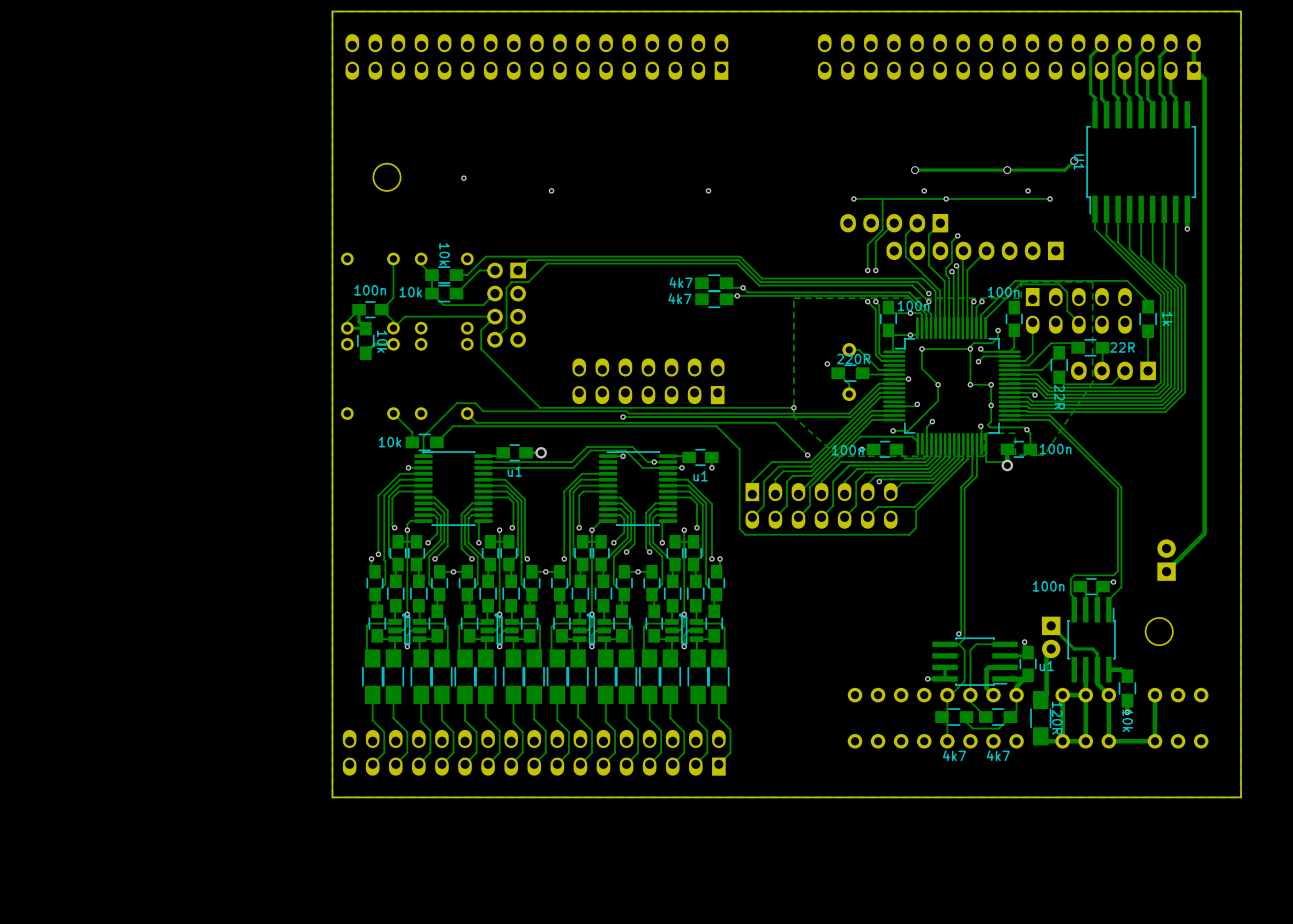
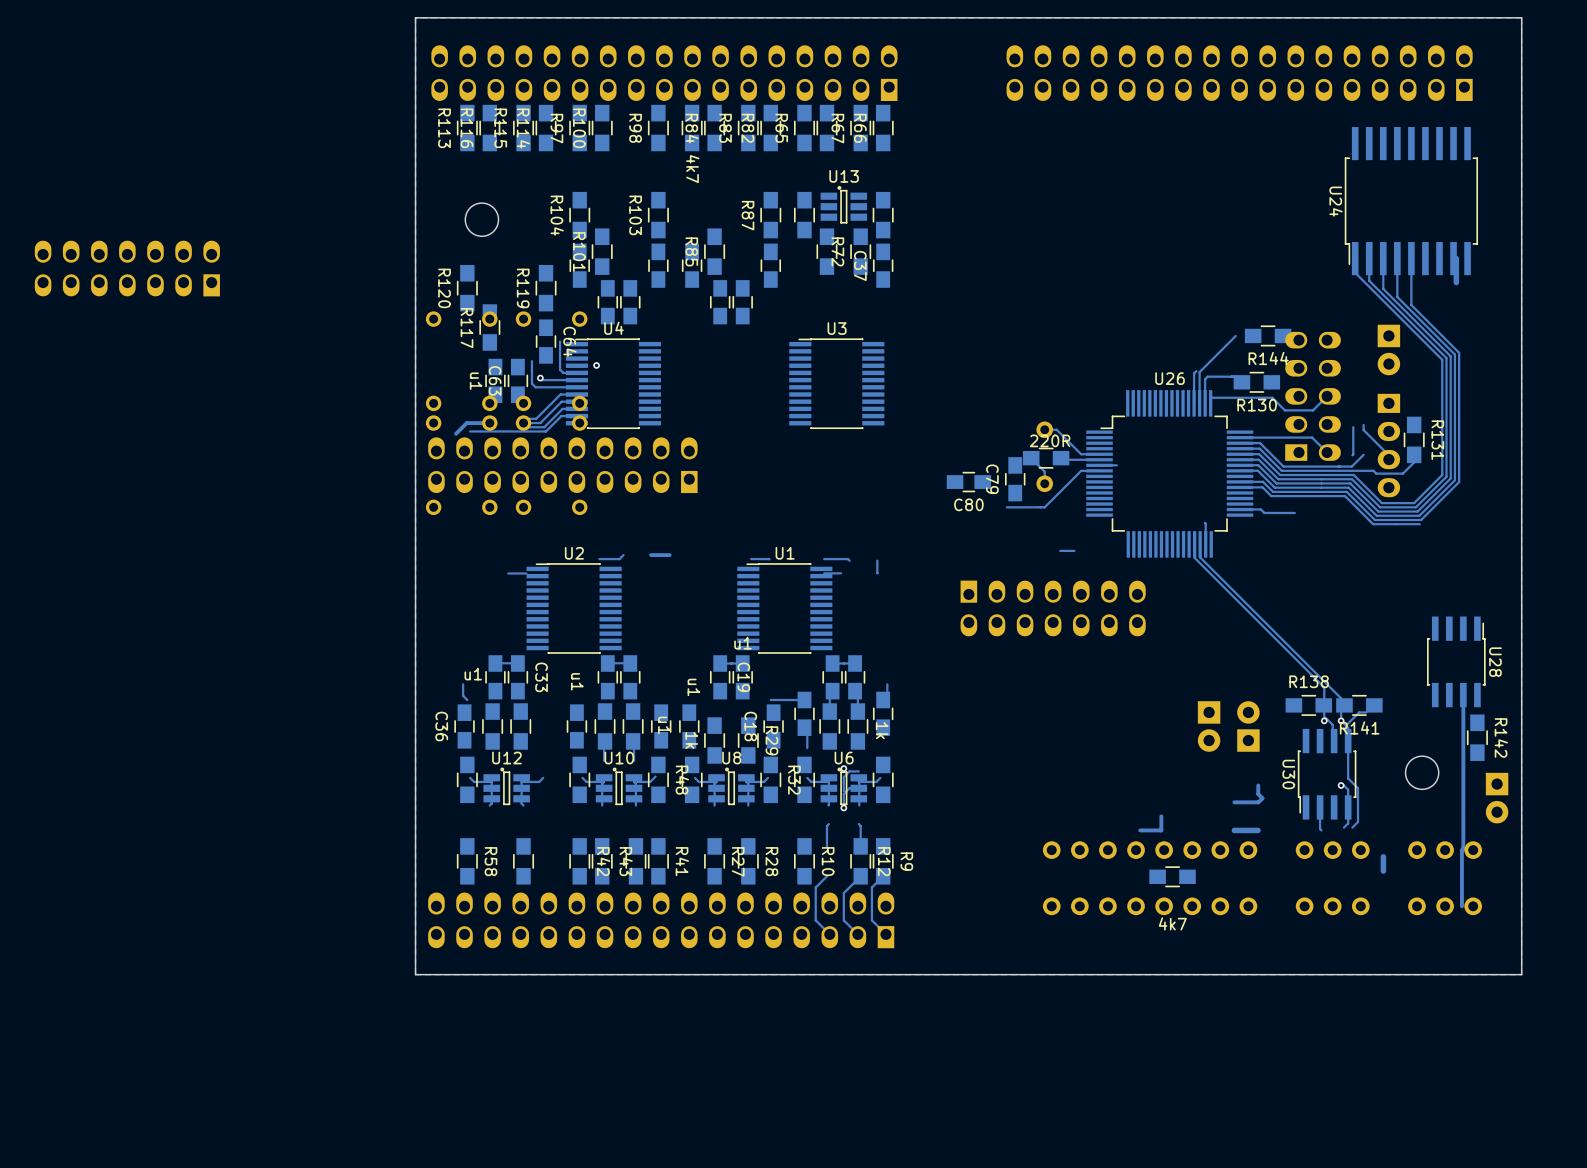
track: (1101, 45) (1090, 56) (1090, 93) (1095, 97) (1095, 114) -> none
track: (1124, 45) (1113, 56) (1113, 93) (1118, 97) (1118, 114) -> none
track: (1147, 45) (1136, 56) (1136, 93) (1141, 97) (1141, 114) -> none
track: (1170, 45) (1159, 56) (1159, 93) (1164, 97) (1164, 114) -> none
track: (1193, 45) (1193, 68) (1204, 79) (1204, 533) (1166, 571) -> none
track: (1101, 68) (1101, 98) (1106, 103) (1106, 114) -> none
track: (1124, 68) (1124, 93) (1129, 97) (1129, 114) -> none
track: (1147, 68) (1147, 98) (1152, 103) (1152, 114) -> none
track: (1170, 68) (1170, 93) (1175, 97) (1175, 114) -> none
U1 footprint: [1086, 101, 1196, 223] -> [737, 563, 833, 654]
R113: none -> (467, 128)
R116: none -> (489, 128)
R115: none -> (523, 128)
R114: none -> (546, 128)
R97: none -> (579, 128)
R100: none -> (602, 128)
R98: none -> (658, 128)
part: none -> 4k7 (692, 128)
R84: none -> (714, 128)
R83: none -> (748, 128)
R82: none -> (770, 128)
R65: none -> (804, 128)
part: none -> (826, 128)
R67: none -> (860, 128)
R66: none -> (883, 128)
track: (1074, 160) (1065, 170) (915, 170) -> none
via: (1074, 160) -> none
U1 name position: U1 (1079, 162) -> U1 (785, 553)
U24: none -> (1411, 201)
U13: none -> (843, 204)
via: (915, 170) -> none
via: (1007, 170) -> none
R104: none -> (579, 215)
R103: none -> (658, 215)
R87: none -> (770, 215)
part: none -> (804, 215)
part: none -> (883, 215)
via: (463, 178) -> none
via: (551, 190) -> none
via: (708, 190) -> none
via: (924, 190) -> none
via: (1028, 190) -> none
via: (853, 198) -> none
track: (882, 198) (882, 229) (867, 244) (867, 270) -> none
via: (946, 198) -> none
track: (1050, 198) (853, 198) -> none
via: (1050, 198) -> none
R101: none -> (602, 251)
R85: none -> (714, 251)
part: none -> (826, 251)
R72: none -> (860, 251)
track: (1095, 209) (1095, 229) (1160, 295) (1160, 382) (1155, 387) (1050, 387) (1037, 374) (1009, 374) -> none
track: (1106, 209) (1106, 235) (1164, 293) (1164, 383) (1156, 391) (1048, 391) (1036, 379) (1009, 379) -> none
track: (1118, 209) (1118, 242) (1167, 292) (1167, 385) (1158, 394) (1047, 394) (1036, 383) (1009, 383) -> none
track: (1129, 209) (1129, 249) (1171, 290) (1171, 386) (1159, 398) (1046, 398) (1036, 388) (1009, 388) -> none
track: (1141, 209) (1141, 255) (1174, 289) (1174, 388) -> (1355, 258) (1355, 272) (1442, 359) (1440, 476)
track: (1152, 209) (1152, 262) (1178, 287) (1178, 389) -> (1369, 258) (1369, 280) (1446, 358) (1445, 478)
track: (1164, 209) (1164, 269) (1181, 286) (1181, 391) -> (1383, 258) (1383, 288) (1450, 356) (1449, 479)
track: (1175, 209) (1175, 275) (1185, 284) (1185, 392) -> (1397, 258) (1397, 296) (1454, 354) (1453, 481)
part: none -> (579, 265)
part: none -> (658, 265)
part: none -> (692, 265)
part: none -> (770, 265)
C37: none -> (883, 265)
part: none -> (127, 268)
track: (894, 223) (875, 241) (875, 270) -> none
part: (894, 223) -> none
track: (917, 223) (905, 234) (905, 256) (940, 290) (940, 328) -> none
track: (940, 223) (928, 234) (928, 265) (944, 281) (944, 328) -> none
via: (1187, 228) -> none
R120: none -> (467, 288)
R119: none -> (546, 288)
track: (957, 235) (951, 241) (951, 262) (946, 268) (946, 275) (949, 278) (949, 328) -> none
via: (957, 235) -> none
part: none -> (607, 302)
part: none -> (630, 302)
part: none -> (720, 302)
part: none -> (742, 302)
track: (963, 250) (962, 328) -> none
part: (975, 250) -> none
track: (986, 250) (967, 270) (967, 328) -> none
track: (393, 258) (393, 298) (381, 309) (393, 321) (393, 328) (405, 316) (495, 316) (481, 330) (481, 348) (540, 407) (793, 407) -> none
track: (421, 258) (421, 264) (431, 275) (431, 293) (443, 305) (483, 305) (495, 293) -> none
R117: none -> (489, 327)
track: (956, 265) (958, 267) (958, 328) -> none
via: (956, 265) -> none
track: (495, 270) (479, 270) (456, 293) -> none
track: (518, 270) (528, 260) (738, 260) (760, 282) (917, 282) (928, 293) -> none
via: (867, 270) -> none
via: (875, 270) -> none
track: (951, 271) (953, 273) (953, 328) -> none
via: (951, 271) -> none
R144: none -> (1268, 335)
part: 10k (444, 275) -> none
track: (456, 275) (467, 275) (485, 256) (740, 256) (762, 278) (922, 278) (935, 291) (935, 328) -> none
C64: none -> (546, 341)
track: none -> (560, 341) (560, 369) (563, 372) (576, 372)
zone outline: (1092, 282) (1021, 282) (1021, 298) (793, 298) (793, 417) (837, 456) (984, 456) (984, 433) (1015, 433) (1015, 455) (1044, 455) (1092, 382) (1092, 282) -> none
part: 4k7 (714, 283) -> none
track: (726, 283) (731, 287) (743, 287) (747, 292) (909, 292) (931, 313) (931, 328) -> none
part: none -> (1388, 349)
via: (743, 287) -> none
track: none -> (531, 361) (531, 383) (535, 387) (576, 387)
part: 10k (444, 293) -> none
via: (928, 293) -> none
via: (737, 295) -> none
via: none -> (596, 365)
part: 4k7 (714, 299) -> none
track: (726, 299) (729, 295) (908, 295) (926, 314) (926, 328) -> none
track: (867, 301) (875, 309) (875, 355) (881, 360) (894, 360) -> none
via: (867, 301) -> none
track: (875, 301) (879, 305) (879, 353) (882, 356) (894, 356) -> none
via: (875, 301) -> none
track: (928, 301) (912, 285) (759, 285) (737, 263) (546, 263) (528, 282) (511, 282) (506, 287) (506, 328) (495, 339) -> none
via: (928, 301) -> none
via: (973, 301) -> none
track: (981, 301) (976, 307) -> (1235, 335) (1199, 372) (1199, 377)
via: (981, 301) -> none
part: (506, 305) -> none
track: (1148, 306) (1148, 301) (1127, 280) (1015, 280) (981, 315) -> (1241, 382) (1236, 376) (1207, 376) (1205, 379) (1205, 387)
track: none -> (540, 378) (542, 380) (576, 380)
via: none -> (540, 378)
track: (888, 307) (894, 313) (920, 313) (921, 328) -> none
U26 name: none -> U26 (1170, 378)
part: 100n (370, 309) -> none
part: none -> u1 (495, 380)
C63: none -> (517, 380)
R130: none -> (1256, 382)
part rotation: 0° (1078, 310) -> 90° counterclockwise (1313, 396)
U4: none -> (613, 383)
U3: none -> (836, 383)
via: (910, 313) -> none
part: 100n (888, 318) -> none
part: 100n (1014, 318) -> none
part: 1k (1148, 318) -> none
track: none -> (576, 394) (560, 394) (536, 418) (529, 418)
track: (1032, 322) (1032, 353) (1025, 360) (1009, 360) -> (1363, 454) (1351, 466) (1283, 466) (1260, 443) (1239, 443)
track: (1078, 322) (1067, 310) (1067, 292) (1059, 284) (1020, 284) (985, 318) (985, 328) -> none
track: none -> (1327, 396) (1313, 410) (1284, 410) (1272, 397) (1210, 397)
track: none -> (576, 401) (561, 401) (540, 423) (529, 423)
track: (365, 328) (347, 328) (347, 321) (359, 309) (359, 321) (365, 328) -> none
track: (917, 328) (915, 335) (893, 335) (888, 330) -> none
track: (998, 330) (998, 337) (992, 343) (973, 343) (970, 346) (970, 384) (991, 384) (991, 421) (987, 425) (990, 427) (1024, 427) (1030, 433) (1030, 449) -> none
via: (998, 330) -> none
track: (1014, 330) (1014, 347) (1009, 351) (983, 351) (980, 348) -> none
track: (1148, 331) (1148, 370) -> none
track: none -> (576, 408) (562, 408) (544, 427) (526, 427)
track: (893, 334) (894, 351) -> none
via: (910, 335) -> none
track: none -> (576, 416) (561, 416) (546, 431) (470, 431)
part: 10k (365, 340) -> none
track: none -> (1363, 424) (1363, 430) (1388, 455) (1388, 459)
track: (1078, 347) (1073, 343) (1051, 343) (1028, 365) (1009, 365) -> (1414, 454) (1414, 462) (1402, 473) (1376, 473) (1373, 470) (1281, 470) (1259, 448) (1239, 448)
part: 22R (1090, 347) -> none
via: (921, 348) -> none
track: (970, 348) (921, 348) (921, 368) (938, 384) (938, 400) (908, 430) (893, 430) -> none
via: (970, 348) -> none
via: (980, 348) -> none
track: (1059, 352) (1042, 369) (1009, 369) -> (1424, 492) (1414, 503) (1381, 503) (1353, 475) (1280, 475) (1259, 454) (1239, 454)
track: (1009, 356) (983, 356) (978, 361) -> (1239, 437) (1312, 437) (1327, 452)
R131: none -> (1414, 439)
via: (978, 361) -> none
via: (827, 363) -> none
part: 22R (1059, 365) -> none
part rotation: 0° (1113, 370) -> 90° counterclockwise (1388, 445)
track: (1125, 370) (1111, 384) (1063, 384) (1059, 377) -> none
part: none -> (562, 465)
via: (908, 379) -> none
part: (648, 381) -> none
via: (938, 384) -> none
via: (970, 384) -> none
via: (991, 384) -> none
track: (894, 388) (879, 388) (850, 417) (623, 417) -> none
C79: none -> (1015, 479)
C80: none -> (968, 482)
track: (894, 392) (879, 392) (810, 462) (771, 462) (752, 481) (752, 494) -> none
track: (1009, 392) (1032, 392) (1035, 395) -> (1239, 481) (1263, 481) (1273, 491) (1346, 491) (1374, 519) (1421, 519) (1459, 482) (1459, 352) (1411, 305) (1411, 258)
via: (1035, 395) -> none
track: (894, 397) (880, 397) (810, 466) -> none
track: (1009, 397) (1028, 397) (1032, 401) (1161, 401) -> (1239, 487) (1262, 487) (1271, 496) (1345, 496) (1373, 524) (1419, 524)
track: (1009, 401) (1027, 401) (1030, 405) (1162, 405) -> (1239, 459) (1258, 459) (1278, 479) (1352, 479) (1380, 507) (1415, 507) (1426, 496)
track: (917, 404) (915, 406) (894, 406) -> none
via: (917, 404) -> none
via: (991, 405) -> none
track: (1009, 406) (1027, 406) (1029, 408) (1164, 408) -> (1239, 465) (1258, 465) (1276, 483) (1350, 483) (1378, 511) (1417, 511) (1428, 501)
via: (793, 407) -> none
track: (894, 410) (871, 410) (811, 471) (783, 471) (775, 479) (775, 494) -> none
track: (1009, 410) (1165, 411) -> (1239, 470) (1257, 470) (1274, 487) (1348, 487) (1376, 515) (1419, 515) (1429, 505)
track: (393, 413) (412, 432) (412, 442) -> none
track: (467, 413) (476, 422) (775, 422) (807, 455) -> none
track: (818, 413) (483, 411) (475, 403) (456, 403) (423, 436) (423, 456) -> none
track: (894, 415) (871, 415) (811, 475) (792, 475) (786, 481) (786, 505) (775, 517) -> none
track: (1009, 415) (1049, 415) (1121, 486) (1121, 587) (1108, 599) (1108, 609) -> (1239, 509) (1260, 509) (1264, 512) (1294, 512)
via: (623, 417) -> none
track: (894, 419) (872, 419) (798, 494) -> none
track: (1009, 419) (1049, 419) (1117, 488) (1117, 571) (1113, 575) (1074, 575) (1070, 578) (1070, 594) (1074, 597) (1074, 609) -> none
track: (932, 421) (926, 427) (926, 455) (924, 458) (905, 458) (896, 449) -> none
via: (932, 421) -> none
via: (980, 426) -> none
via: (1026, 429) -> none
via: (893, 430) -> none
part: 10k (424, 442) -> none
track: (436, 442) (453, 426) (716, 426) (739, 449) (739, 528) (745, 534) (909, 534) (916, 527) (916, 510) (967, 459) (967, 444) -> none
track: (917, 444) (912, 436) (860, 436) (810, 487) (810, 505) (798, 517) -> none
track: (931, 444) (931, 456) (925, 462) (841, 462) (821, 481) (821, 494) -> none
track: (936, 444) (936, 456) (927, 465) (849, 465) (833, 481) (833, 505) (821, 517) -> none
track: (940, 444) (940, 456) (928, 468) (857, 468) (844, 481) (844, 494) -> none
track: (945, 444) (945, 457) (929, 472) (865, 472) (856, 481) (856, 505) (844, 517) -> none
track: (949, 444) (949, 457) (931, 475) (875, 475) (867, 483) (867, 494) -> none
track: (954, 444) (954, 457) (932, 479) (881, 479) (879, 481) -> none
track: (958, 444) (958, 458) (934, 482) (902, 482) (890, 494) -> none
track: (963, 444) (963, 458) (914, 507) -> none
track: (986, 444) (986, 461) (1005, 462) (1007, 459) (1007, 449) (1007, 449) (1007, 465) -> none
via: (861, 449) -> none
part: 100n (885, 449) -> none
part: 100n (1018, 449) -> none
part: u1 (514, 452) -> none
via: (541, 452) -> none
track: (976, 454) (976, 476) (964, 488) (964, 638) (958, 644) -> (1200, 557) (1341, 698) (1341, 720) (1348, 727) (1348, 778) (1358, 788) (1358, 822) (1352, 827)
via: (807, 455) -> none
track: (972, 455) (972, 475) (961, 487) (961, 631) (958, 633) -> (1194, 557) (1324, 687) (1324, 720)
via: (623, 456) -> none
part: u1 (700, 457) -> none
via: (654, 462) -> none
track: (668, 462) (647, 462) (632, 447) (587, 447) (572, 462) (483, 462) -> none
via: (1007, 465) -> none
track: (811, 466) (778, 466) (763, 481) (763, 505) (752, 517) -> none
via: (408, 467) -> none
track: (668, 467) (642, 467) (625, 450) (590, 450) (573, 467) (483, 467) -> none
via: (681, 467) -> none
via: (711, 467) -> none
track: (423, 473) (400, 473) (378, 495) (378, 554) -> none
track: (608, 473) (581, 473) (564, 491) (564, 558) -> none
track: (423, 479) (400, 479) (384, 495) (385, 584) (375, 594) (377, 596) (377, 611) -> none
track: (483, 479) (505, 479) (525, 499) (525, 556) (527, 558) -> none
track: (608, 479) (580, 479) (570, 490) (570, 584) (559, 594) (561, 596) (561, 611) -> none
track: (668, 479) (687, 479) (711, 504) (711, 558) -> none
via: (879, 481) -> none
track: (423, 485) (399, 485) (388, 496) (388, 555) (398, 564) (395, 566) (395, 581) -> none
track: (483, 485) (506, 485) (521, 500) (521, 584) (531, 594) (529, 596) (529, 611) -> none
track: (608, 485) (579, 485) (573, 492) (573, 555) (582, 564) (580, 566) (580, 581) -> none
track: (668, 485) (688, 485) (706, 503) (706, 584) (716, 594) (714, 596) (714, 611) -> none
part: (453, 488) -> none
part: (638, 488) -> none
track: (423, 491) (398, 491) (392, 498) (392, 525) (394, 527) -> none
track: (483, 491) (507, 491) (518, 502) (518, 555) (508, 564) (511, 566) (511, 581) -> none
track: (608, 491) (583, 491) (579, 495) (579, 527) -> none
track: (668, 491) (689, 491) (702, 504) (702, 555) (693, 563) -> none
U2: none -> (574, 608)
track: (423, 497) (434, 497) (447, 510) (447, 546) (435, 558) -> none
track: (483, 497) (508, 497) (513, 502) (512, 527) -> none
track: (608, 497) (620, 497) (634, 511) (634, 543) (626, 552) -> none
track: (668, 497) (690, 497) (696, 503) (696, 527) -> none
track: (423, 503) (434, 503) (444, 512) (444, 541) (429, 556) (429, 584) (439, 594) (437, 596) (437, 611) -> none
track: (483, 503) (472, 503) (461, 513) (461, 548) (471, 558) -> none
track: (608, 503) (621, 503) (631, 513) (631, 539) (613, 556) (613, 584) (624, 594) (621, 596) (621, 611) -> none
track: (668, 503) (655, 503) (646, 512) (646, 548) (649, 552) -> none
part position: (821, 505) -> (1053, 608)
track: (914, 507) (878, 507) (867, 517) -> none
track: (423, 509) (433, 509) (440, 516) (440, 540) (416, 564) (418, 566) (418, 581) -> none
track: (483, 509) (472, 509) (465, 516) (465, 544) (477, 556) (477, 584) (467, 594) (469, 596) (469, 611) -> none
track: (608, 509) (620, 509) (627, 516) (627, 538) (601, 564) (603, 566) (603, 581) -> none
track: (668, 509) (655, 509) (649, 515) (649, 544) (662, 556) (662, 584) (651, 593) -> none
track: (423, 515) (433, 515) (437, 518) (437, 533) (428, 542) -> none
track: (483, 515) (471, 515) (468, 518) (468, 542) (490, 564) (488, 566) (488, 581) -> none
track: (608, 515) (620, 515) (624, 518) (624, 532) (613, 542) -> none
track: (668, 515) (656, 515) (653, 518) (653, 542) (675, 563) -> none
track: (423, 521) (410, 521) (407, 524) (407, 625) (402, 630) (395, 630) -> none
track: (483, 521) (478, 523) (478, 542) -> none
track: (608, 521) (601, 521) (591, 530) (591, 625) (587, 630) (579, 630) -> none
track: (668, 521) (662, 523) (662, 542) -> none
part value: none -> u1 (742, 643)
via: (394, 527) -> none
via: (512, 527) -> none
via: (579, 527) -> none
via: (696, 527) -> none
via: (407, 530) -> none
track: (499, 530) (499, 625) (495, 630) (487, 630) -> none
via: (499, 530) -> none
via: (591, 530) -> none
track: (684, 530) (684, 625) (679, 630) (671, 630) -> none
via: (684, 530) -> none
U28: none -> (1456, 661)
via: (428, 542) -> none
via: (478, 542) -> none
via: (613, 542) -> none
via: (662, 542) -> none
part value: none -> u1 (473, 674)
via: (626, 552) -> none
via: (649, 552) -> none
C33 name: none -> C33 (541, 677)
C19 name: none -> C19 (743, 677)
via: (378, 554) -> none
via: (371, 558) -> none
via: (435, 558) -> none
via: (471, 558) -> none
via: (527, 558) -> none
via: (564, 558) -> none
via: (711, 558) -> none
via: (720, 558) -> none
part: (1166, 560) -> none
track: none -> (1463, 695) (1461, 906)
via: (453, 571) -> none
track: (467, 571) (439, 571) -> none
via: (545, 571) -> none
track: (559, 571) (531, 571) -> none
via: (638, 571) -> none
R138: none -> (1308, 705)
R141: none -> (1359, 705)
via: (1113, 582) -> none
part: (375, 583) -> none
part: (439, 583) -> none
part: (467, 583) -> none
part: (531, 583) -> none
part: (559, 583) -> none
part: (624, 583) -> none
part: 100n (1091, 586) -> none
via: none -> (1324, 720)
via: none -> (1341, 720)
C36: none -> (464, 726)
part: none -> u1 (576, 726)
part: none -> u1 (661, 726)
part: none -> u1 (689, 726)
part: (580, 593) -> none
part: (603, 593) -> none
C18: none -> (773, 726)
part: none -> (1209, 726)
part: none -> (1248, 726)
R142: none -> (1477, 737)
track: (395, 605) (393, 623) (369, 623) (366, 625) (366, 652) (372, 658) -> none
track: (418, 605) (421, 623) (444, 623) (447, 627) (447, 652) (441, 658) -> none
part: none -> 1k (714, 740)
track: (580, 605) (577, 623) (555, 623) (551, 627) (551, 652) (557, 658) -> none
track: (603, 605) (605, 623) (628, 623) (632, 627) (632, 652) (626, 658) -> none
R29: none -> (748, 740)
track: (672, 605) (670, 623) (647, 623) (643, 627) (643, 652) (649, 658) -> none
track: (695, 605) (698, 623) (720, 623) (724, 628) (724, 652) (718, 658) -> none
via: (407, 614) -> none
via: (499, 614) -> none
via: (591, 614) -> none
via: (684, 614) -> none
track: (488, 621) (485, 623) (461, 623) (459, 625) (459, 652) (465, 658) -> none
track: (511, 621) (513, 623) (537, 623) (540, 625) (540, 652) (534, 658) -> none
part position: (377, 623) -> (467, 779)
part: (437, 623) -> none
part position: (469, 623) -> (579, 779)
part: (529, 623) -> none
part position: (561, 623) -> (692, 779)
part: (621, 623) -> none
part position: (654, 623) -> (804, 779)
part: (714, 623) -> none
track: (1051, 625) (1074, 648) (1092, 648) (1097, 653) (1097, 683) (1108, 695) (1108, 741) (1155, 741) (1155, 695) -> none
part: (407, 628) -> none
part: (499, 628) -> none
part: (591, 628) -> none
part: (684, 628) -> none
via: none -> (843, 768)
track: (419, 630) (411, 630) (407, 635) (407, 646) -> none
track: (511, 630) (504, 630) (499, 635) (499, 646) -> none
track: (604, 630) (596, 630) (591, 635) (591, 646) -> (858, 788) (849, 788) (843, 793) (843, 807)
U30: none -> (1327, 774)
via: (958, 633) -> none
R48: none -> (658, 779)
R32: none -> (770, 779)
part: none -> 1k (883, 779)
part: (1051, 637) -> none
part: (1091, 639) -> none
U12: none -> (506, 786)
U10: none -> (619, 786)
U8: none -> (731, 786)
U6: none -> (843, 786)
via: (1024, 642) -> none
track: none -> (1341, 785) (1348, 789) (1348, 823) (1343, 827)
via: none -> (1341, 785)
track: (958, 644) (964, 650) (964, 681) (950, 695) (947, 695) (947, 711) (941, 717) (947, 722) (947, 741) -> none
track: (1005, 644) (976, 644) (970, 650) (970, 701) (985, 717) -> none
via: (407, 646) -> none
via: (499, 646) -> none
via: (591, 646) -> none
via: (684, 646) -> none
track: (1051, 648) (1046, 653) (1046, 694) (1040, 700) -> none
part: none -> (1497, 798)
via: none -> (843, 807)
track: none -> (1320, 807) (1321, 830)
part: (975, 661) -> none
part: u1 (1028, 663) -> none
track: (1005, 667) (988, 667) (986, 669) (986, 688) (993, 695) -> none
track: (1085, 669) (1085, 741) (1045, 741) (1040, 736) -> none
track: (1108, 669) (1121, 669) (1127, 676) -> none
track: none -> (828, 824) (826, 826) (826, 846)
track: none -> (858, 824) (860, 826) (860, 846)
track: (1028, 675) (1016, 686) (1016, 710) (998, 728) (972, 728) (966, 722) (966, 717) -> none
part: (372, 676) -> none
part: (393, 676) -> none
part: (421, 676) -> none
part: (441, 676) -> none
part: (465, 676) -> none
part: (485, 676) -> none
part: (513, 676) -> none
part: (534, 676) -> none
part: (557, 676) -> none
part: (578, 676) -> none
part: (605, 676) -> none
part: (626, 676) -> none
part: (649, 676) -> none
part: (670, 676) -> none
part: (698, 676) -> none
part: (718, 676) -> none
via: (927, 678) -> none
part: 10k (1127, 688) -> none
track: (372, 694) (372, 720) (384, 732) (384, 752) (372, 764) -> none
track: (393, 694) (393, 718) (407, 732) (407, 752) (395, 764) -> none
track: (421, 694) (421, 721) (430, 730) (430, 752) (418, 764) -> none
track: (441, 694) (441, 720) (453, 732) (453, 752) (441, 764) -> none
track: (465, 694) (465, 720) (476, 732) (476, 752) (465, 764) -> none
track: (485, 694) (485, 717) (499, 730) (499, 752) (488, 764) -> none
track: (513, 694) (513, 722) (522, 732) (522, 752) (511, 764) -> none
track: (534, 694) (534, 719) (545, 730) (545, 752) (534, 764) -> none
track: (557, 694) (557, 720) (568, 732) (568, 752) (557, 764) -> none
track: (578, 694) (578, 717) (591, 730) (591, 752) (580, 764) -> none
track: (605, 694) (605, 721) (615, 730) (615, 752) (603, 764) -> none
track: (626, 694) (626, 718) (638, 729) (638, 752) (626, 764) -> none
track: (649, 694) (649, 719) (661, 730) -> (826, 876) (815, 887) (815, 893)
track: (670, 694) (670, 718) (684, 732) -> (860, 876) (843, 895)
track: (698, 694) (698, 721) (707, 730) -> (883, 876) (871, 887) (871, 893)
track: (718, 694) (718, 718) (730, 729) (730, 752) (718, 764) -> none
track: (1085, 695) (1062, 695) (1062, 741) -> none
R58: none -> (467, 861)
part: none -> (523, 861)
R42: none -> (579, 861)
R43: none -> (602, 861)
part: none -> (635, 861)
R41: none -> (658, 861)
R27: none -> (714, 861)
R28: none -> (748, 861)
R10: none -> (804, 861)
R12: none -> (860, 861)
R9: none -> (883, 861)
via: (1127, 712) -> none
part: 4k7 (998, 717) -> none
part: 120R (1040, 718) -> none
track: (661, 752) (649, 764) -> (815, 920) (829, 934)
track: (684, 752) (672, 764) -> (843, 920) (857, 934)
track: (707, 752) (695, 764) -> (871, 920) (885, 934)

